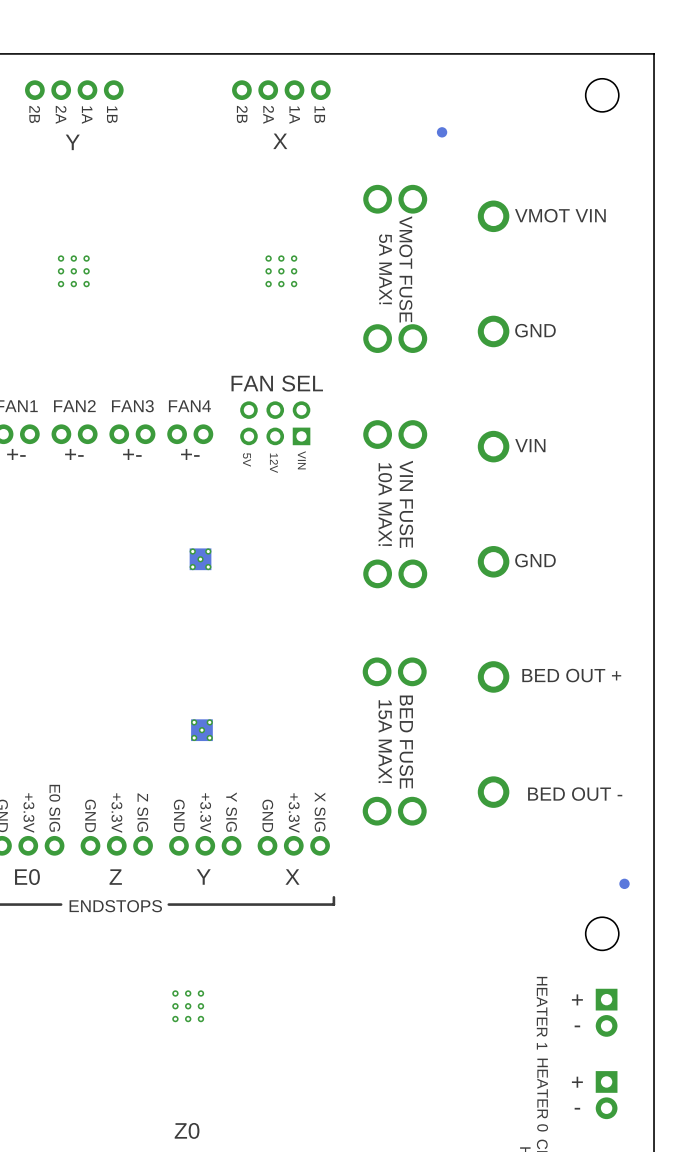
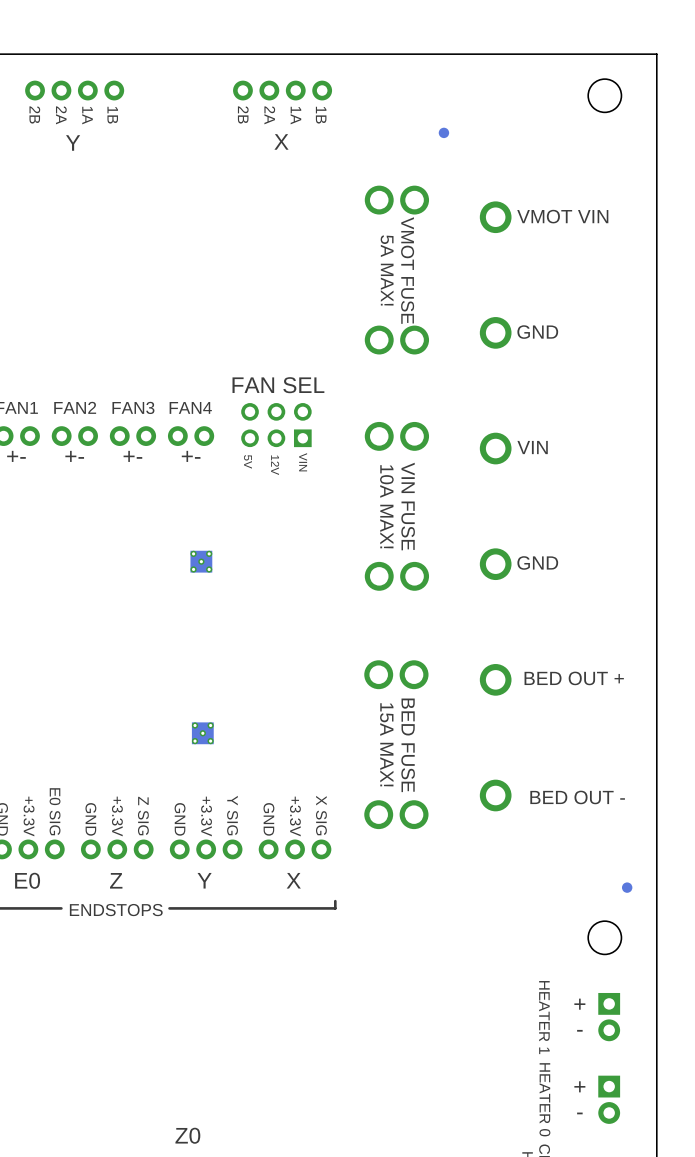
part: (73, 271) -> none
part: (281, 271) -> none
part: (188, 1006) -> none

